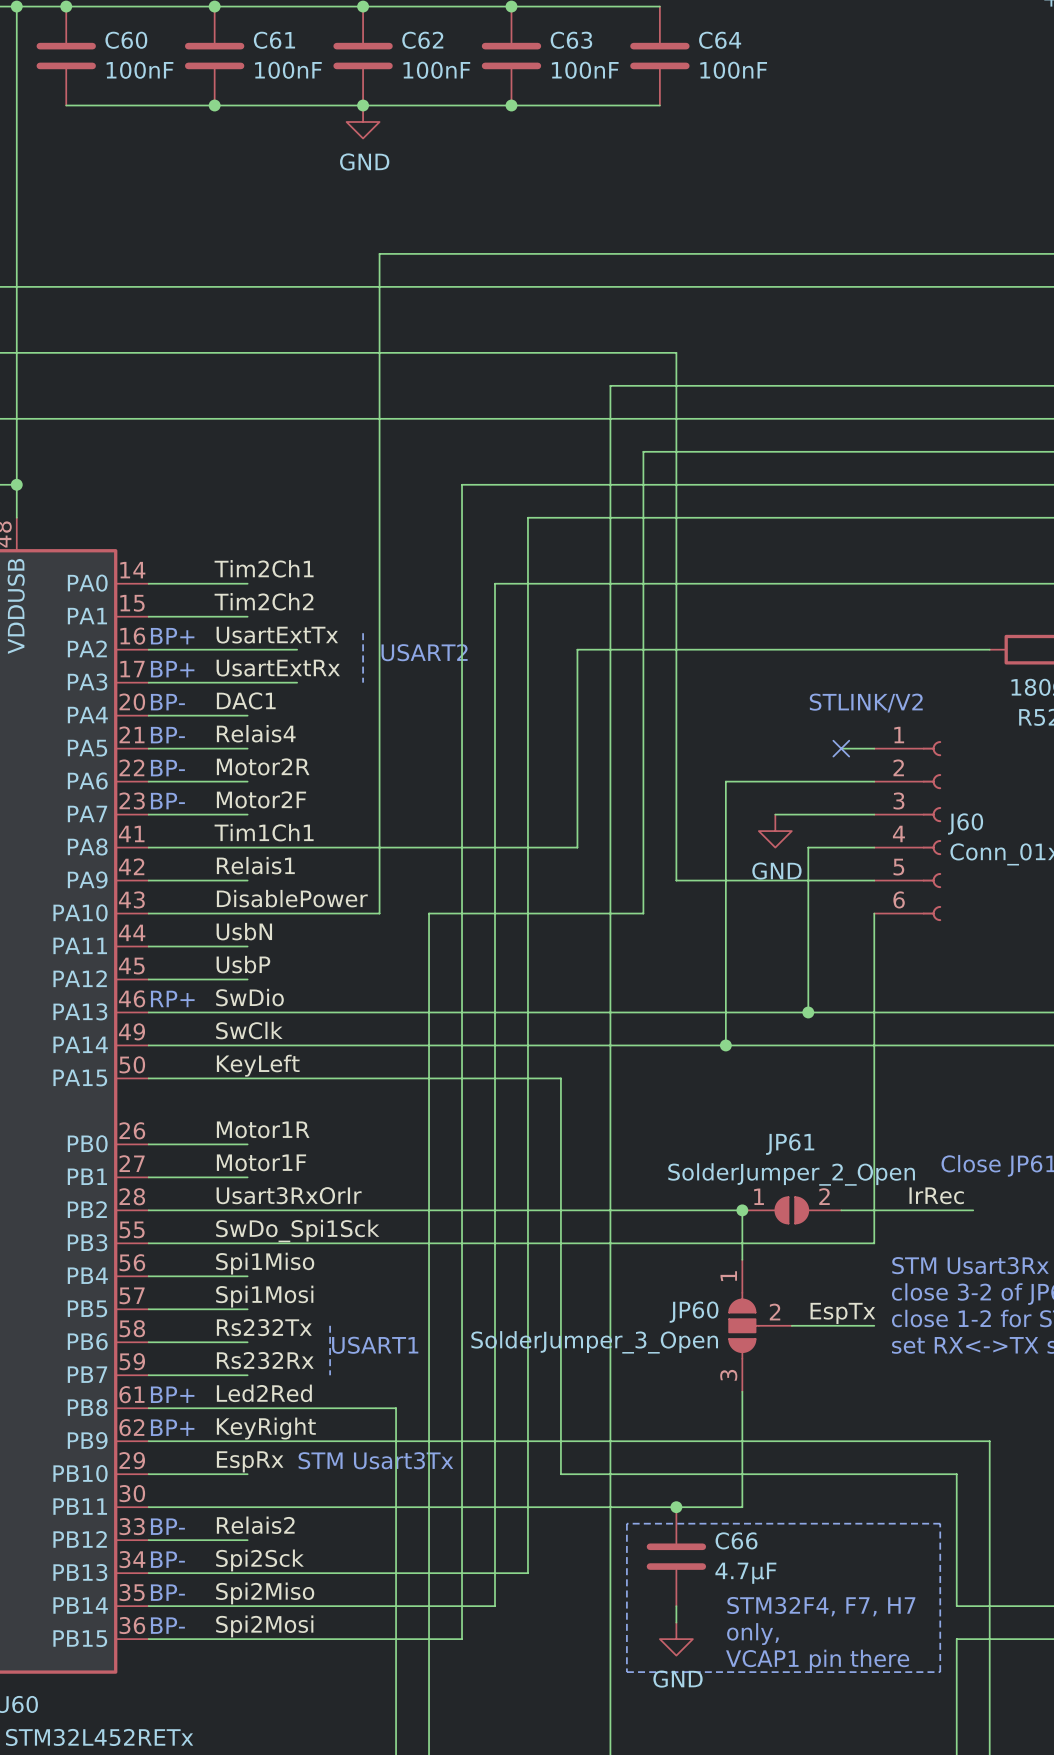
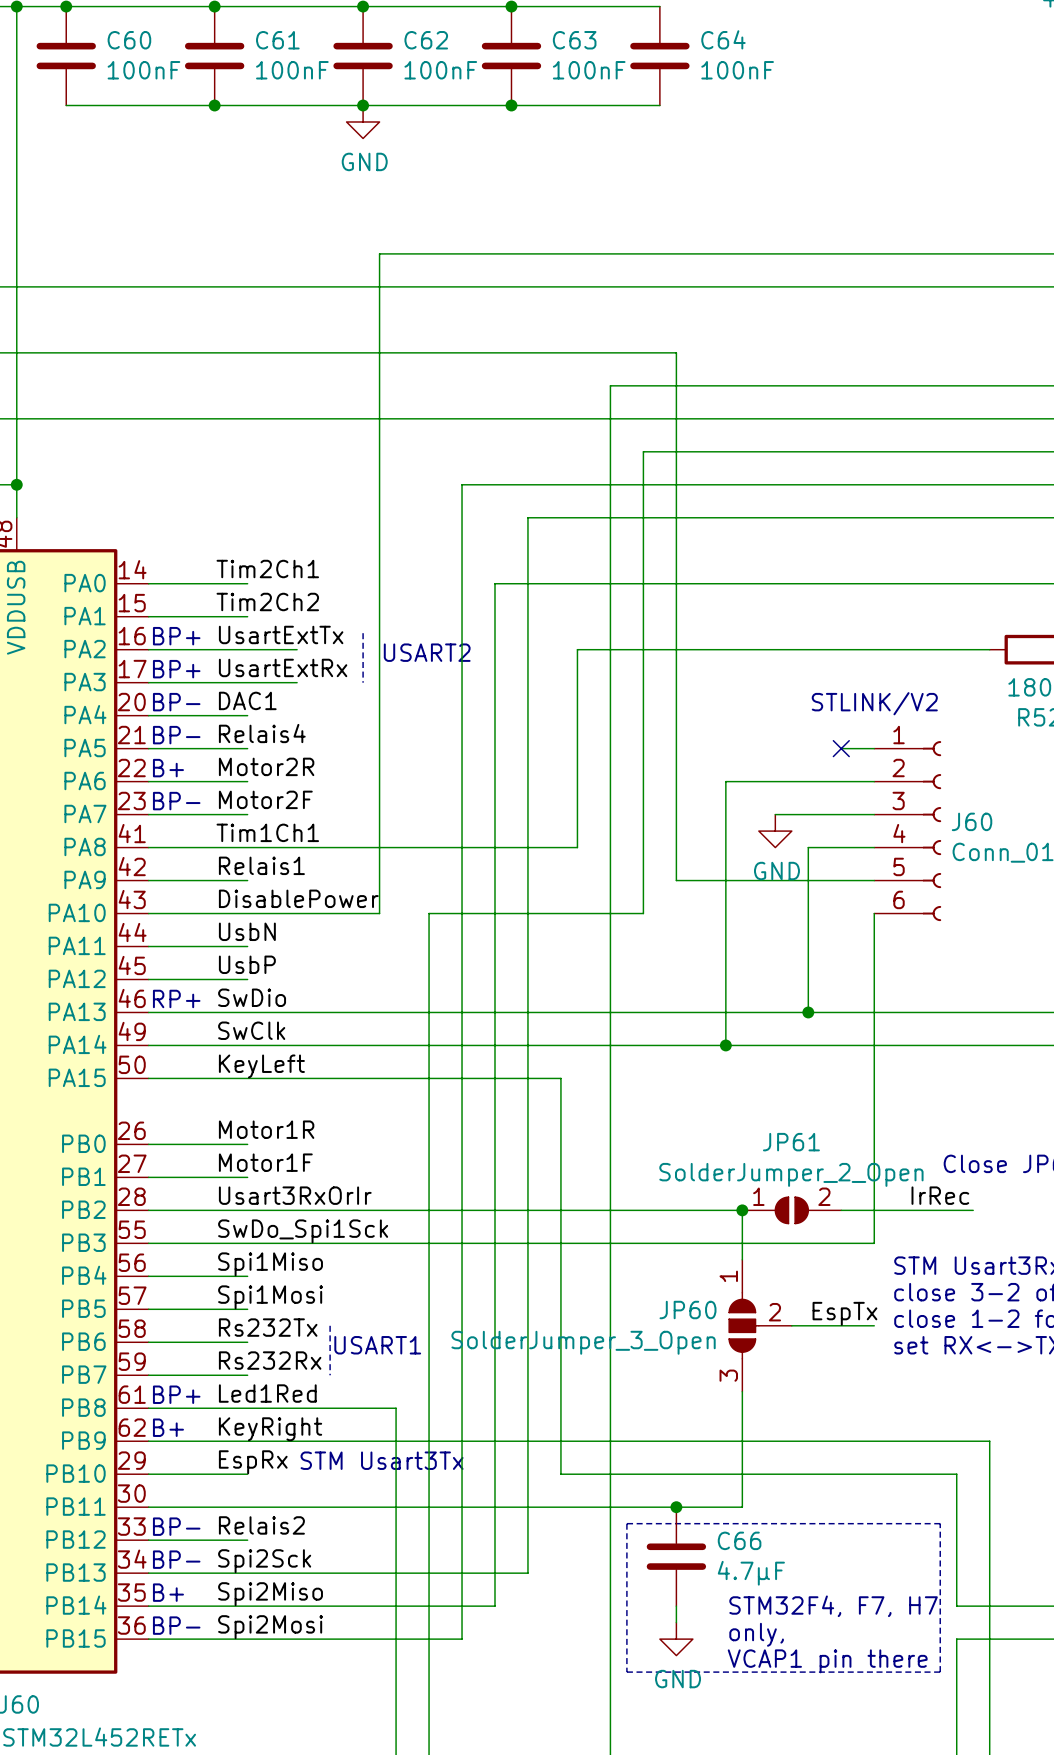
text: BP- (167, 768) -> B+ (168, 768)
label: Led2Red (264, 1393) -> Led1Red (267, 1393)
text: BP+ (172, 1427) -> B+ (168, 1427)
text: BP- (167, 1592) -> B+ (168, 1592)

